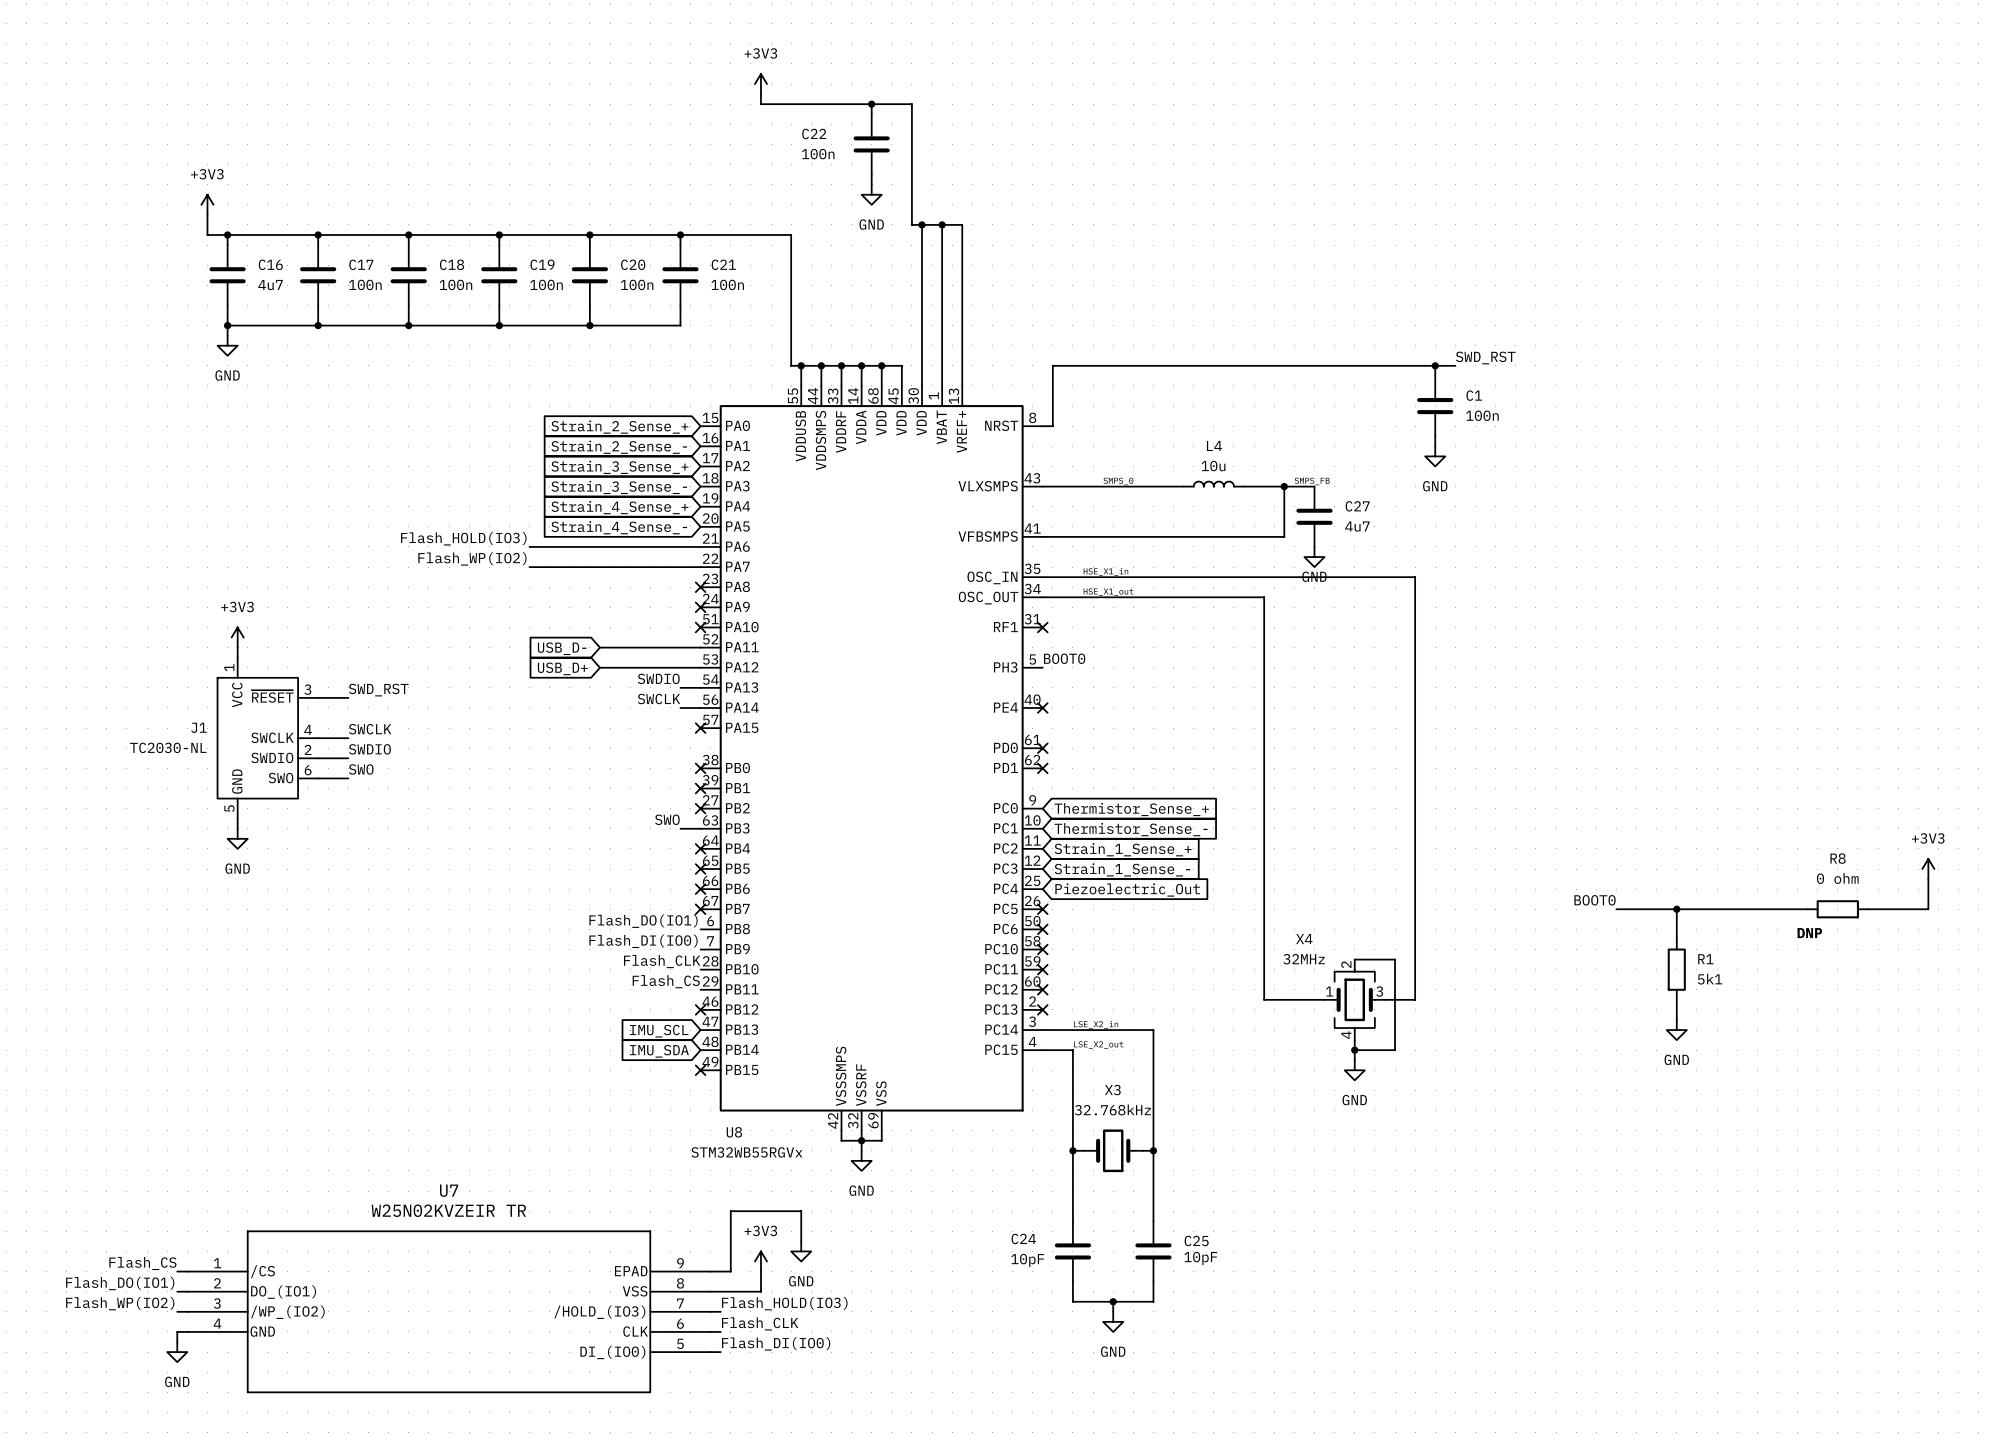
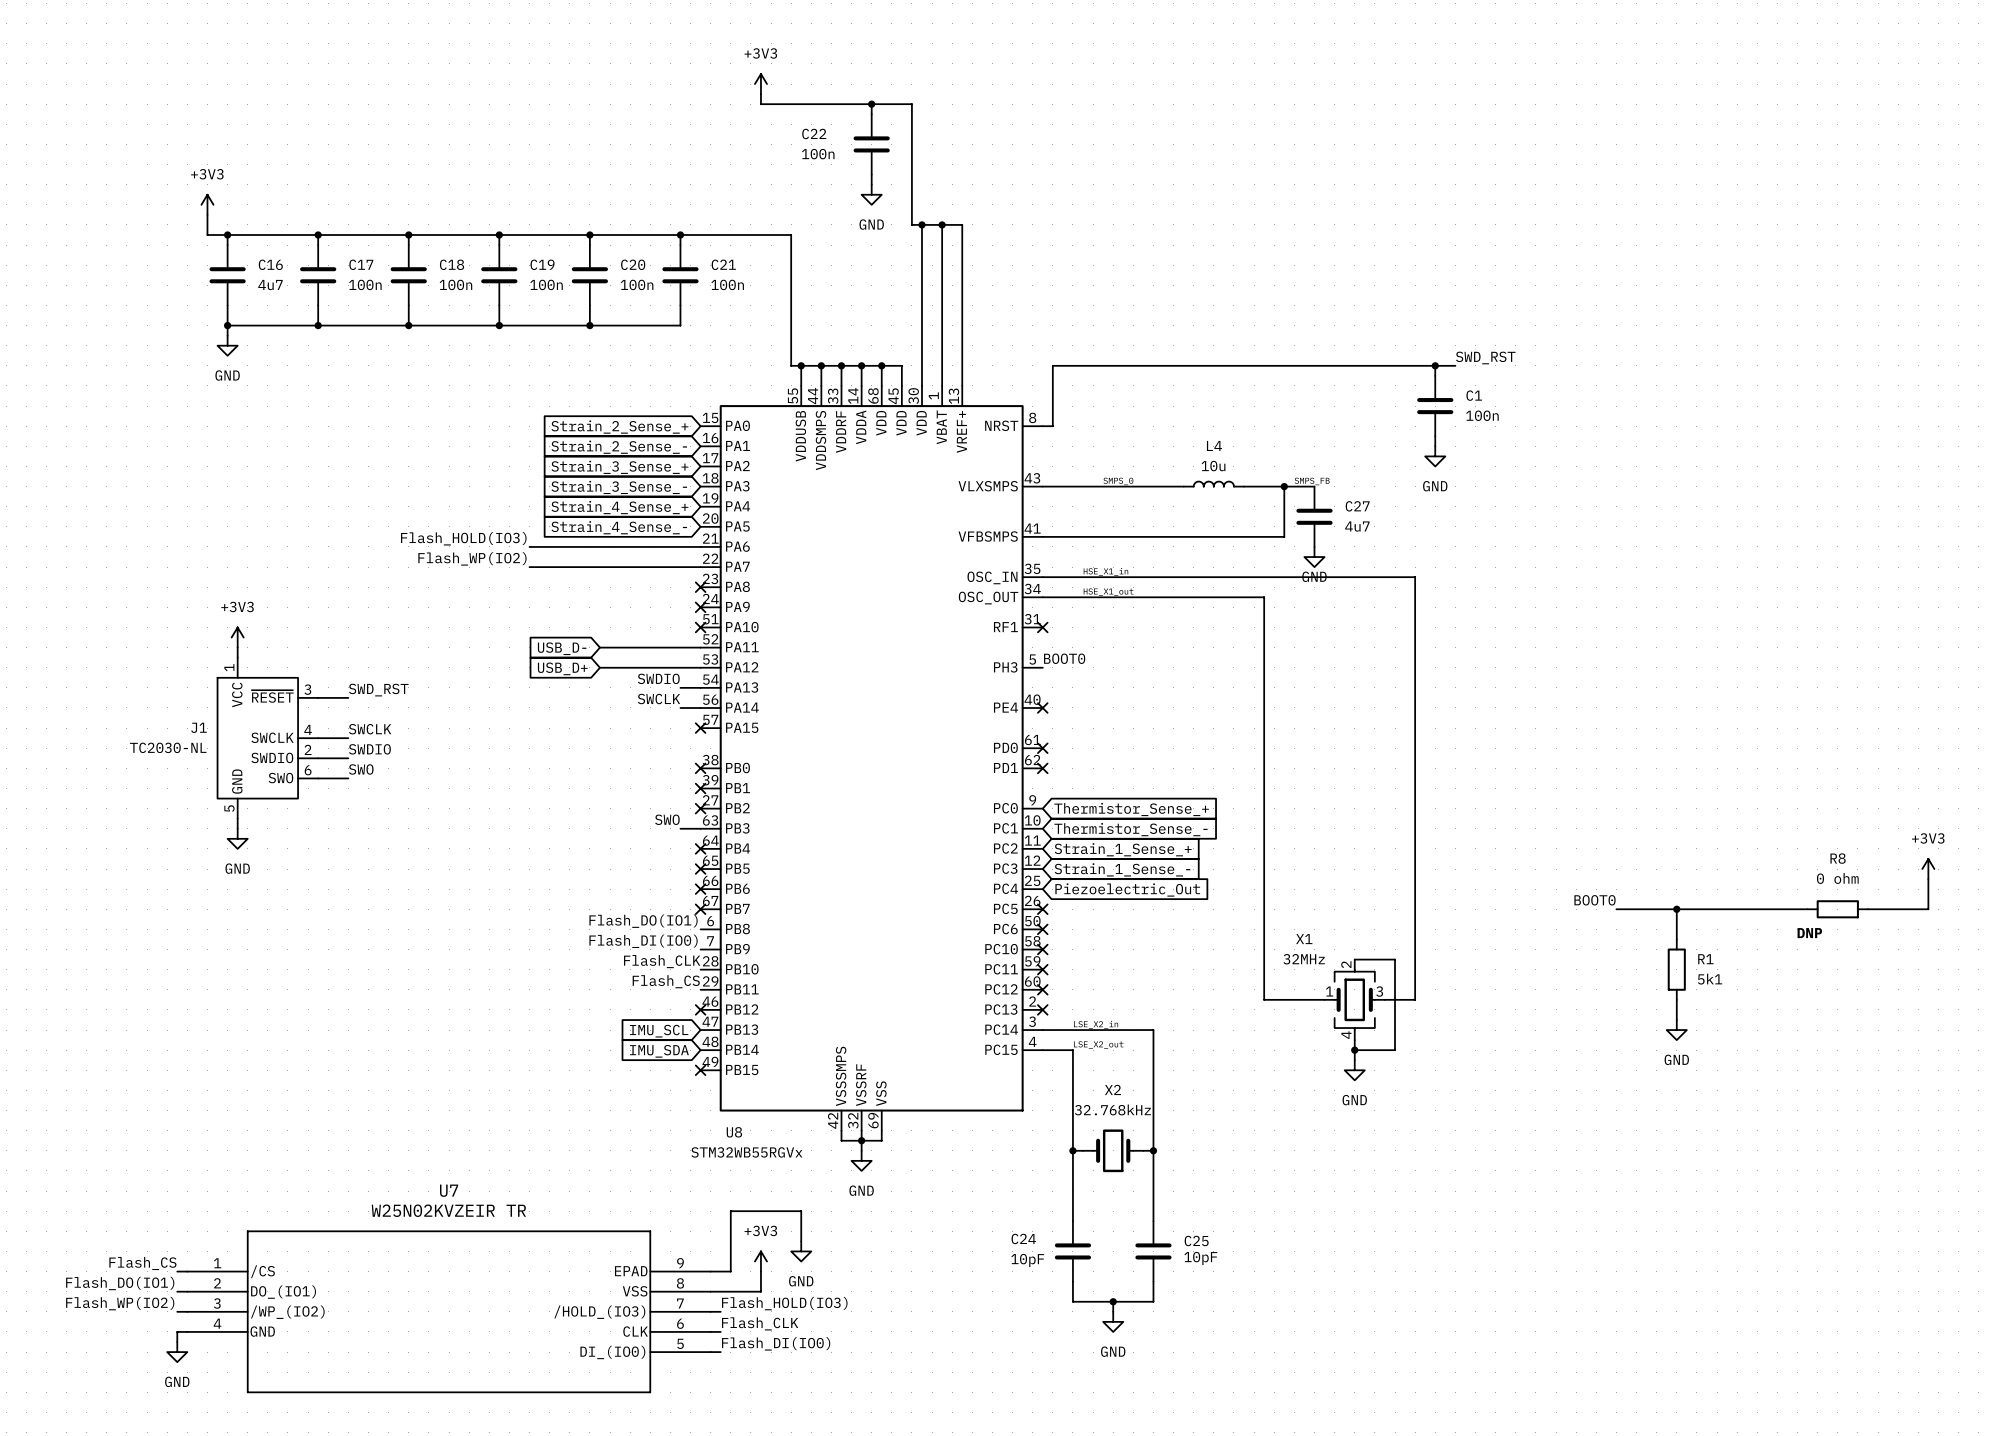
X4 name: X4 (1304, 939) -> X1 (1304, 939)
X3 name: X3 (1112, 1090) -> X2 (1112, 1089)

